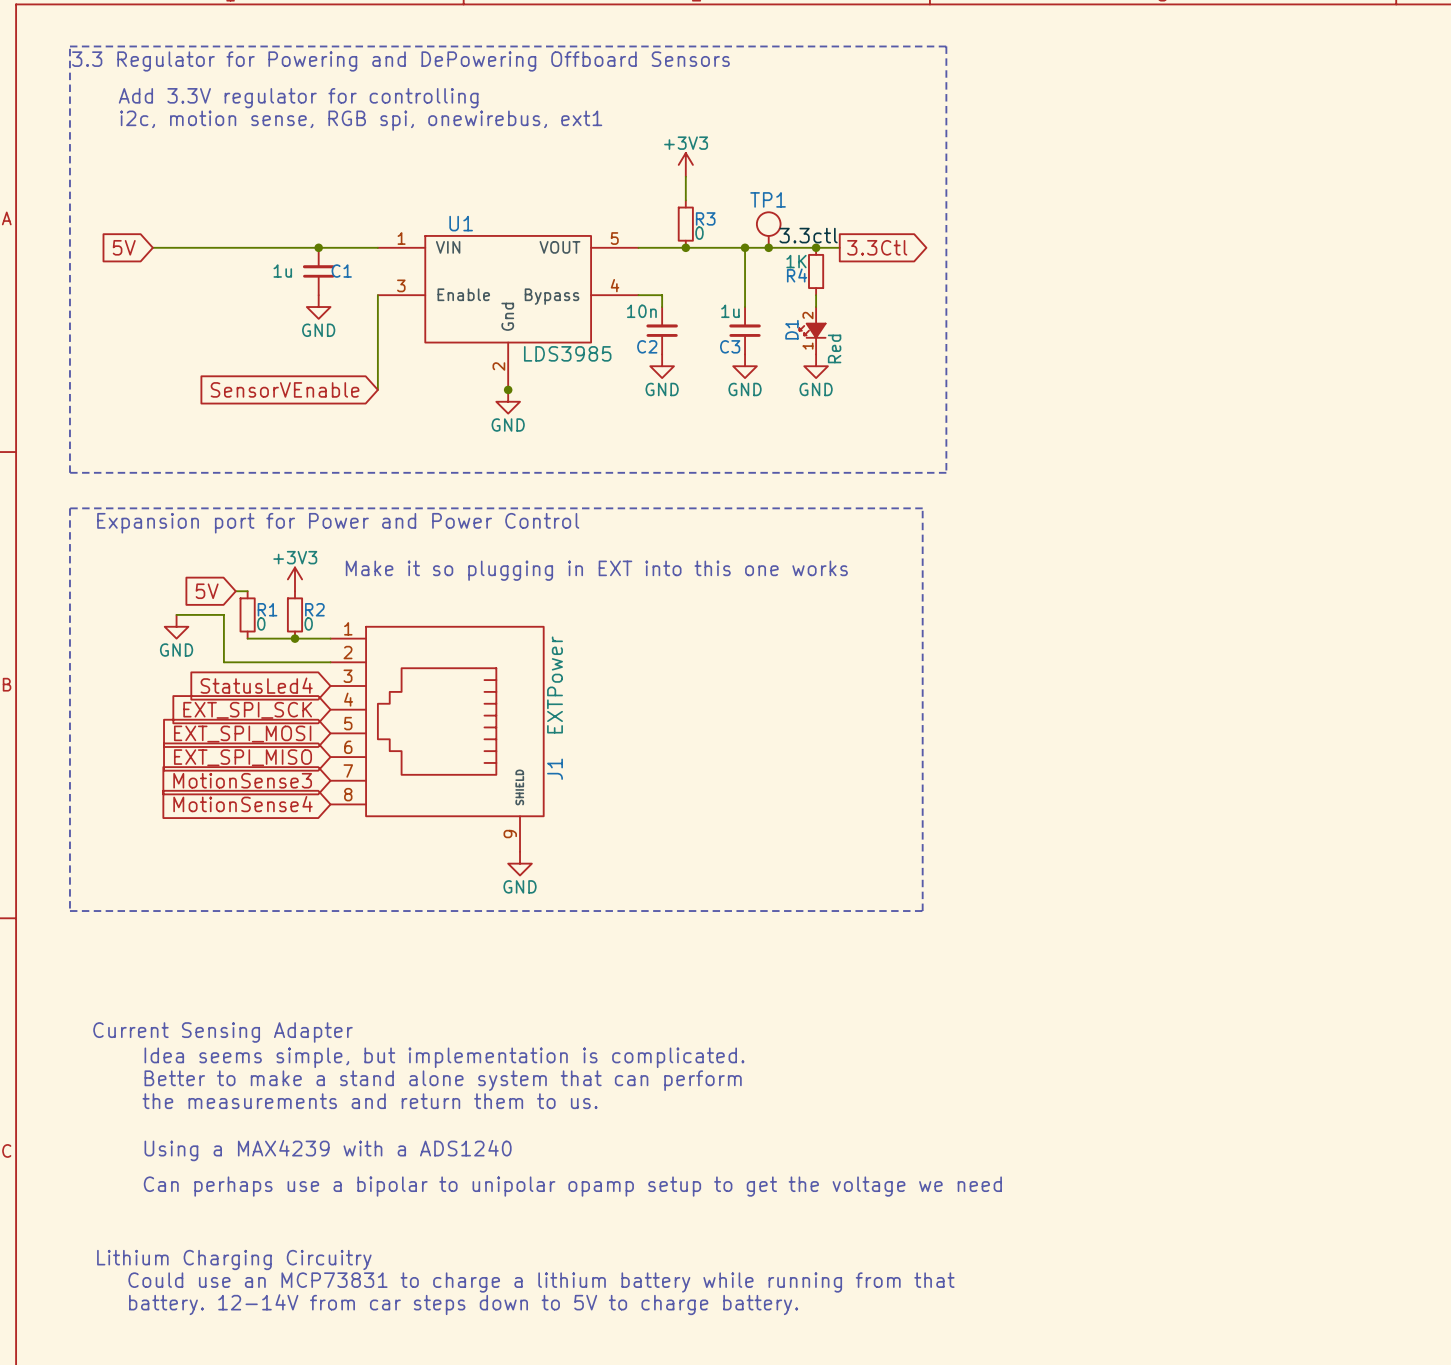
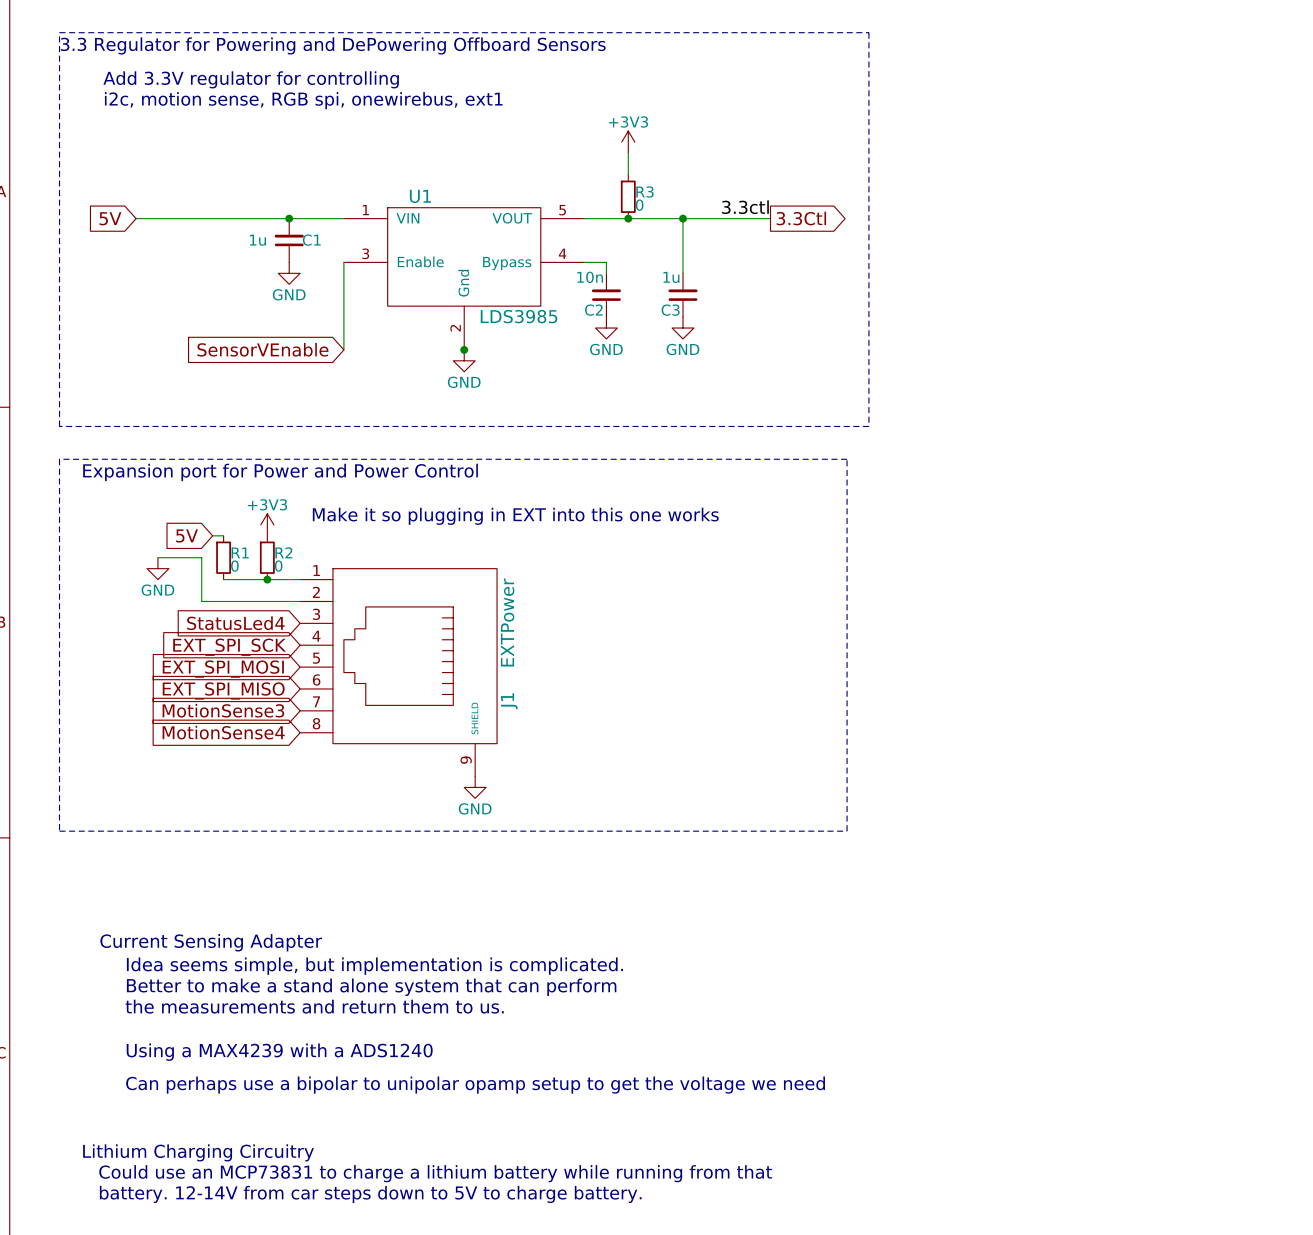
TP1: (768, 230) -> none
junction: (768, 247) -> none
junction: (816, 247) -> none
R4: 1K (816, 271) -> none
wire: (816, 295) (816, 307) -> none
D1: Red (812, 330) -> none
power symbol: GND (816, 366) -> none

